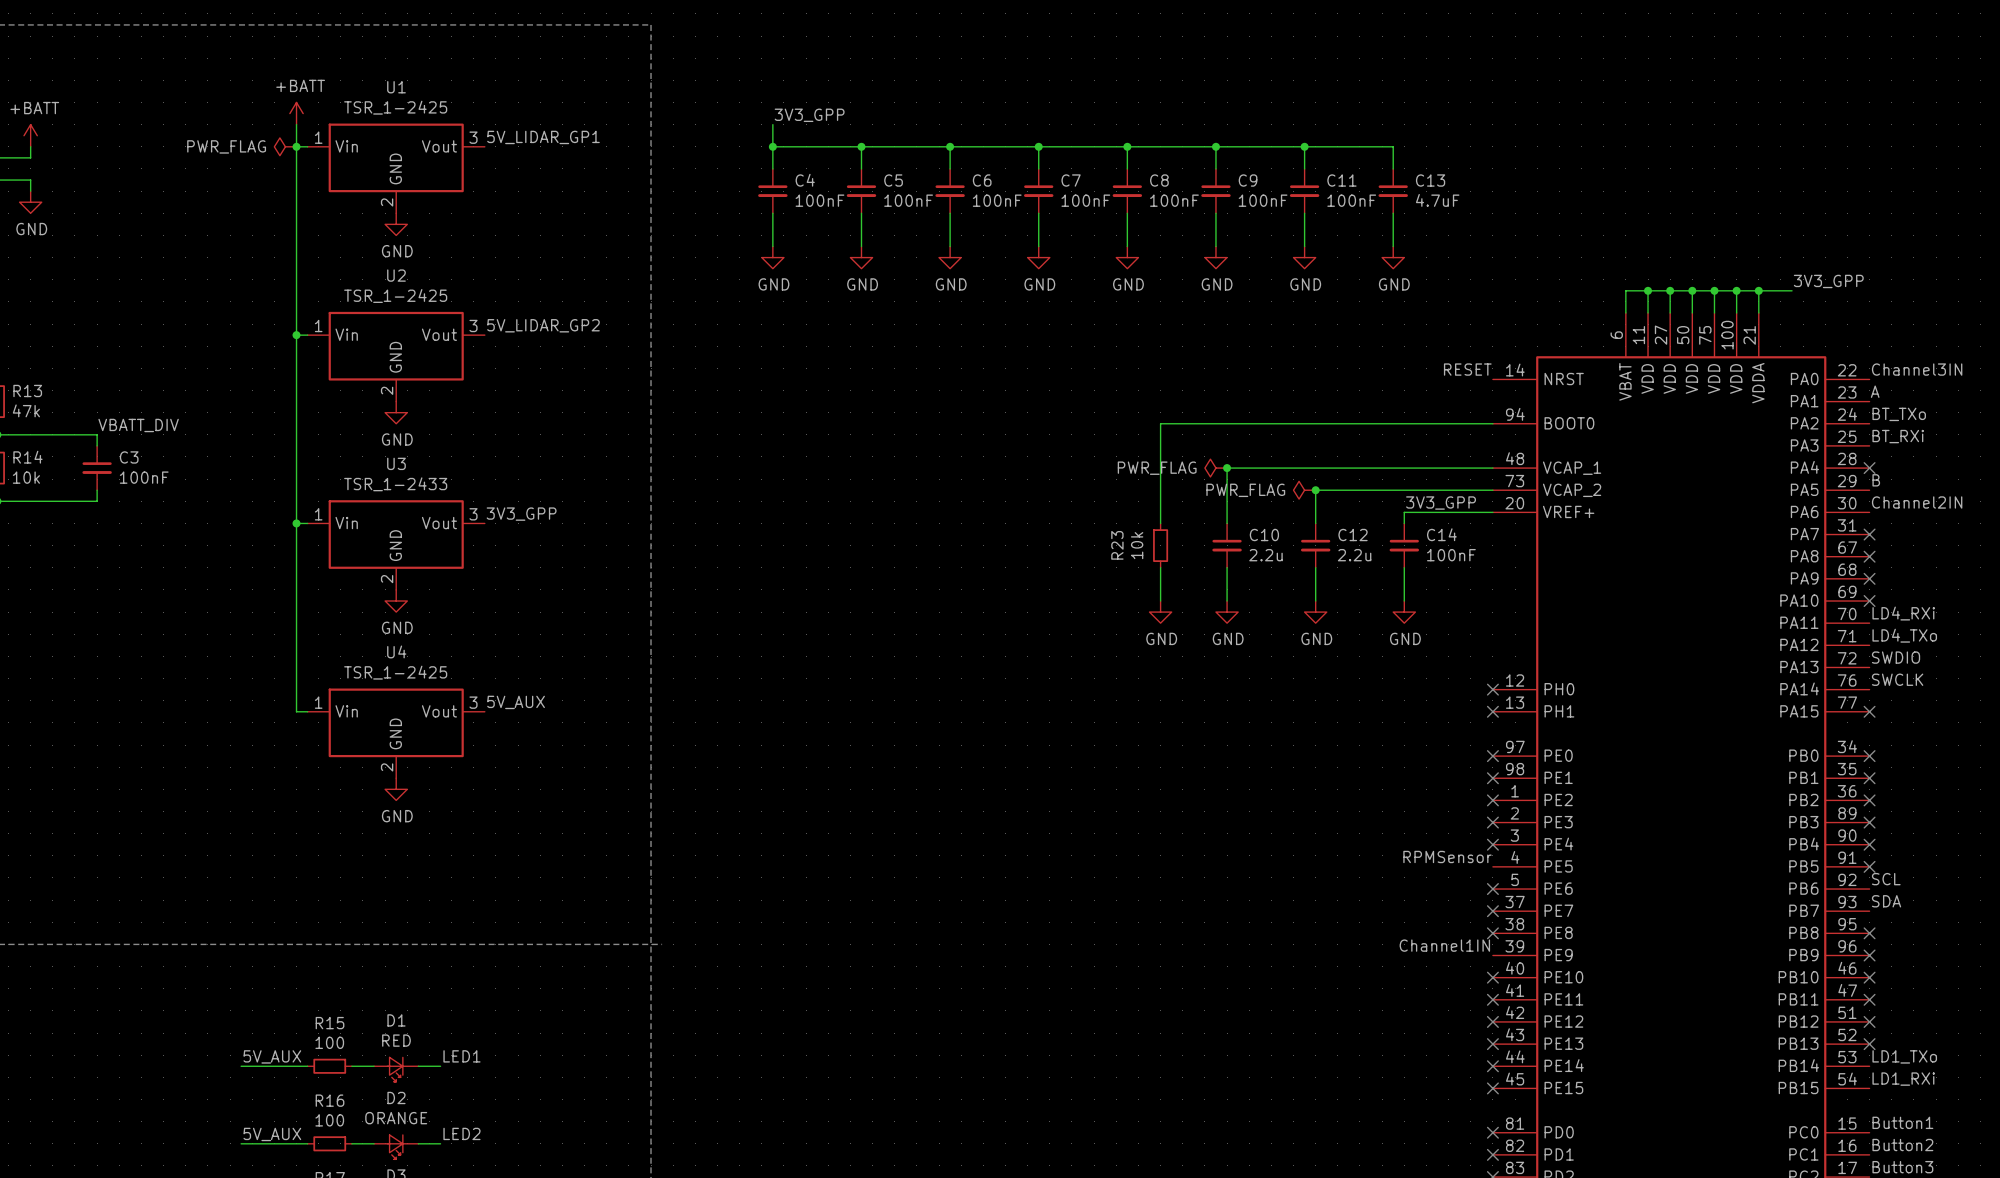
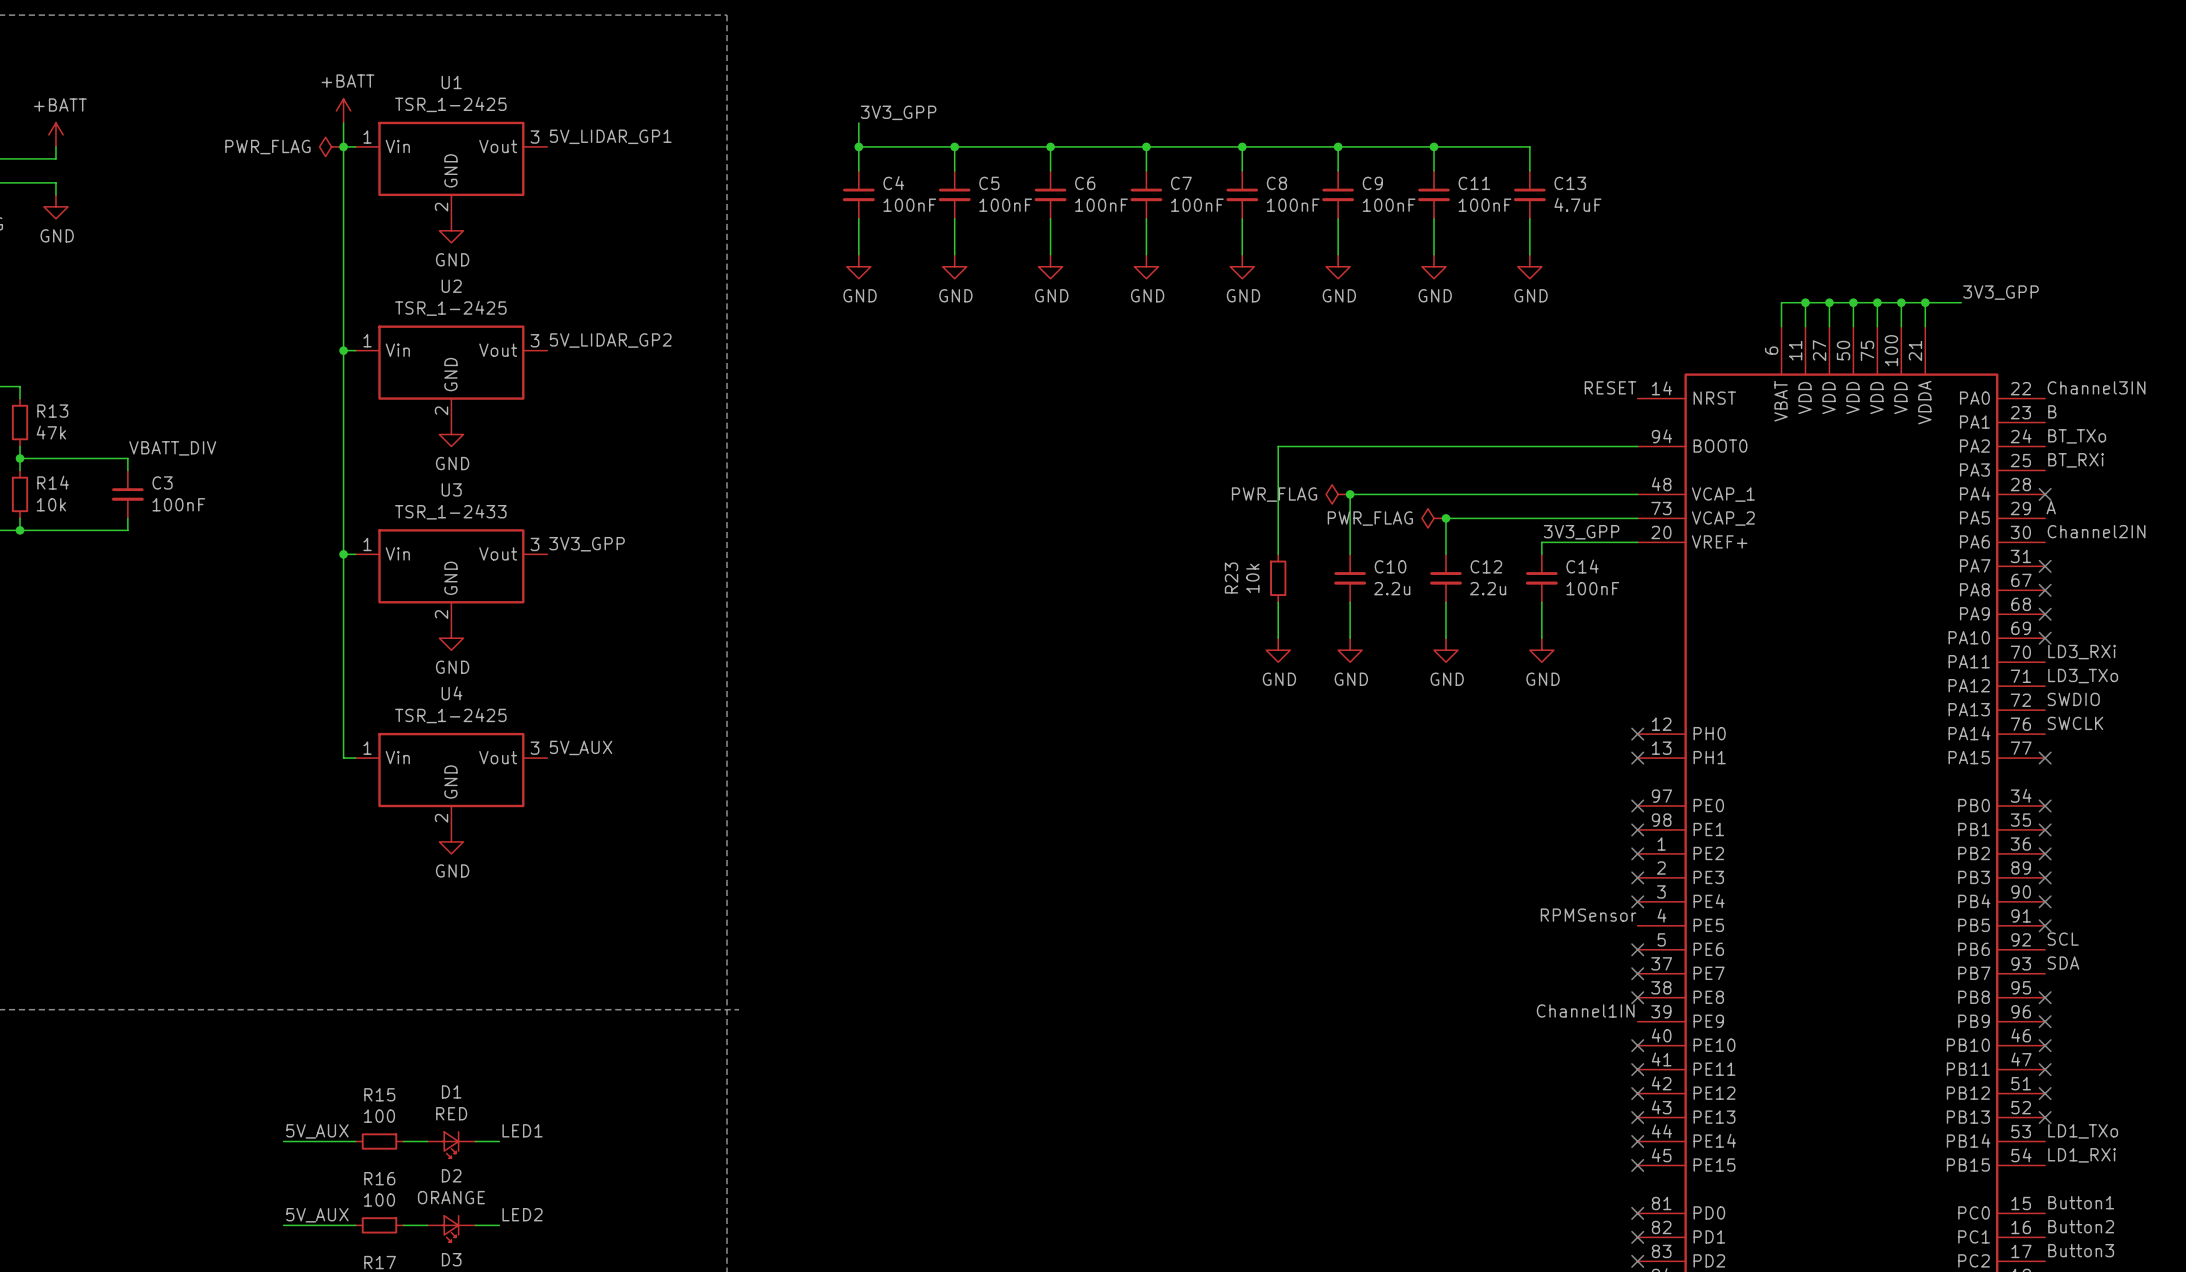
label: A (1875, 391) -> B (2052, 411)
label: B (1876, 480) -> A (2051, 507)
label: LD4_RXi (1903, 613) -> LD3_RXi (2082, 652)
label: LD4_TXo (1904, 635) -> LD3_TXo (2083, 676)

